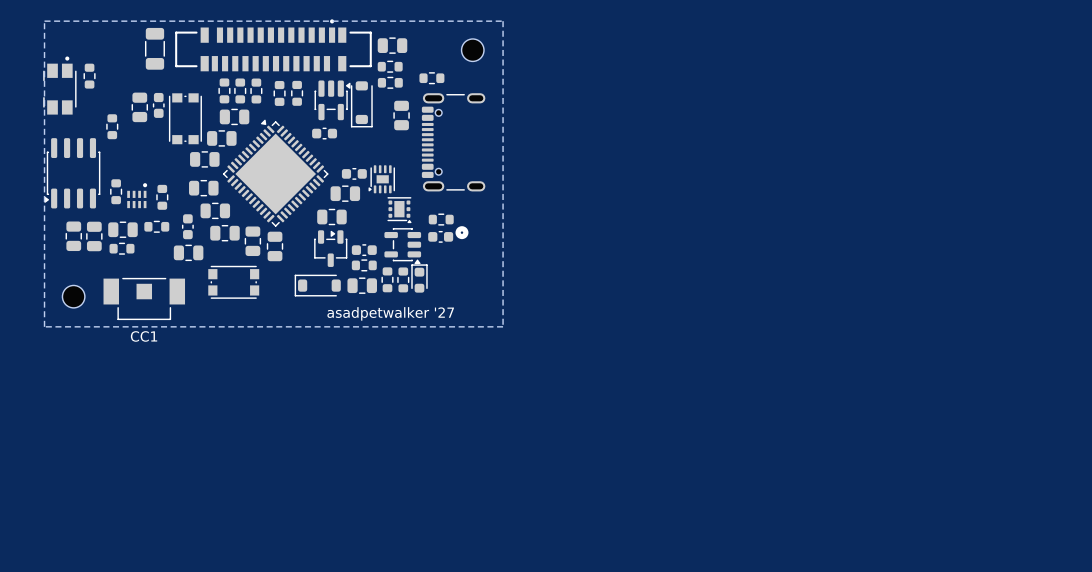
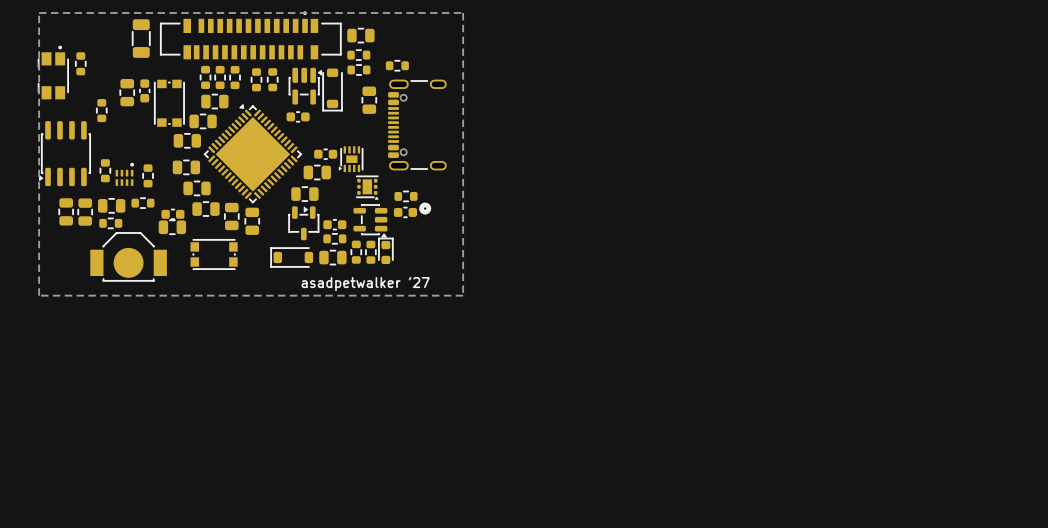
part: (472, 50) -> none
part rotation: 0° (187, 226) -> 90° clockwise (172, 214)
part: none -> (128, 256)
part: (73, 296) -> none
CC1: (144, 298) -> none

